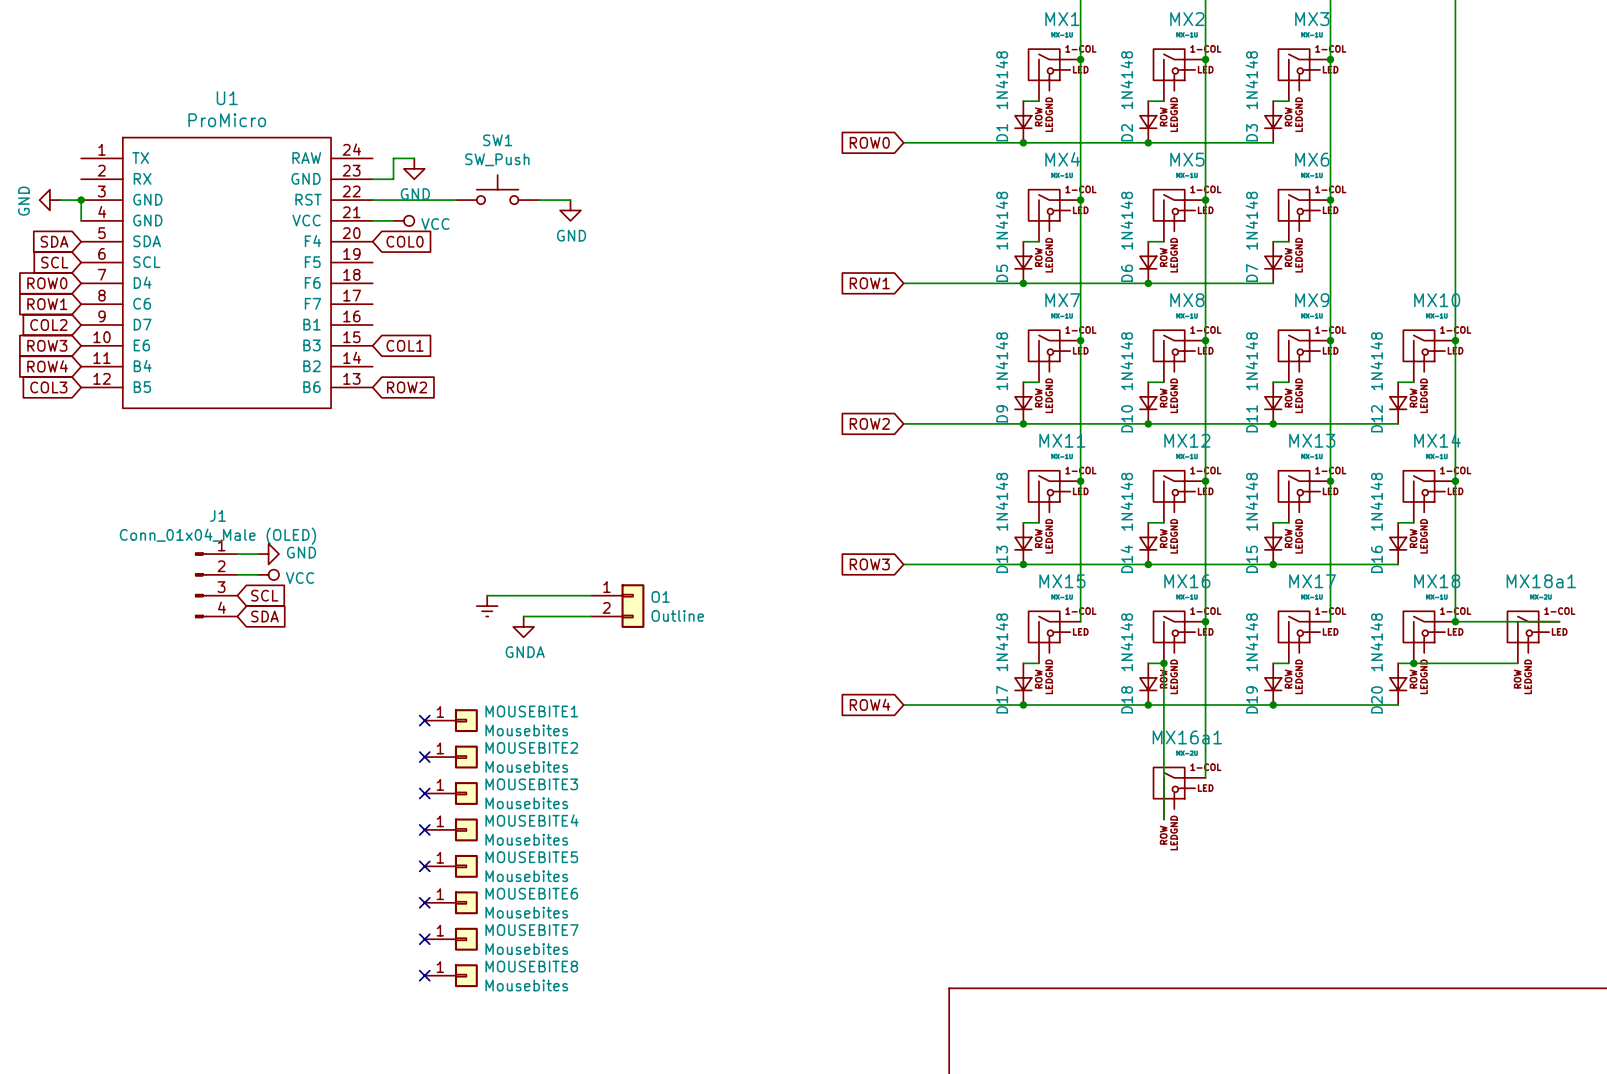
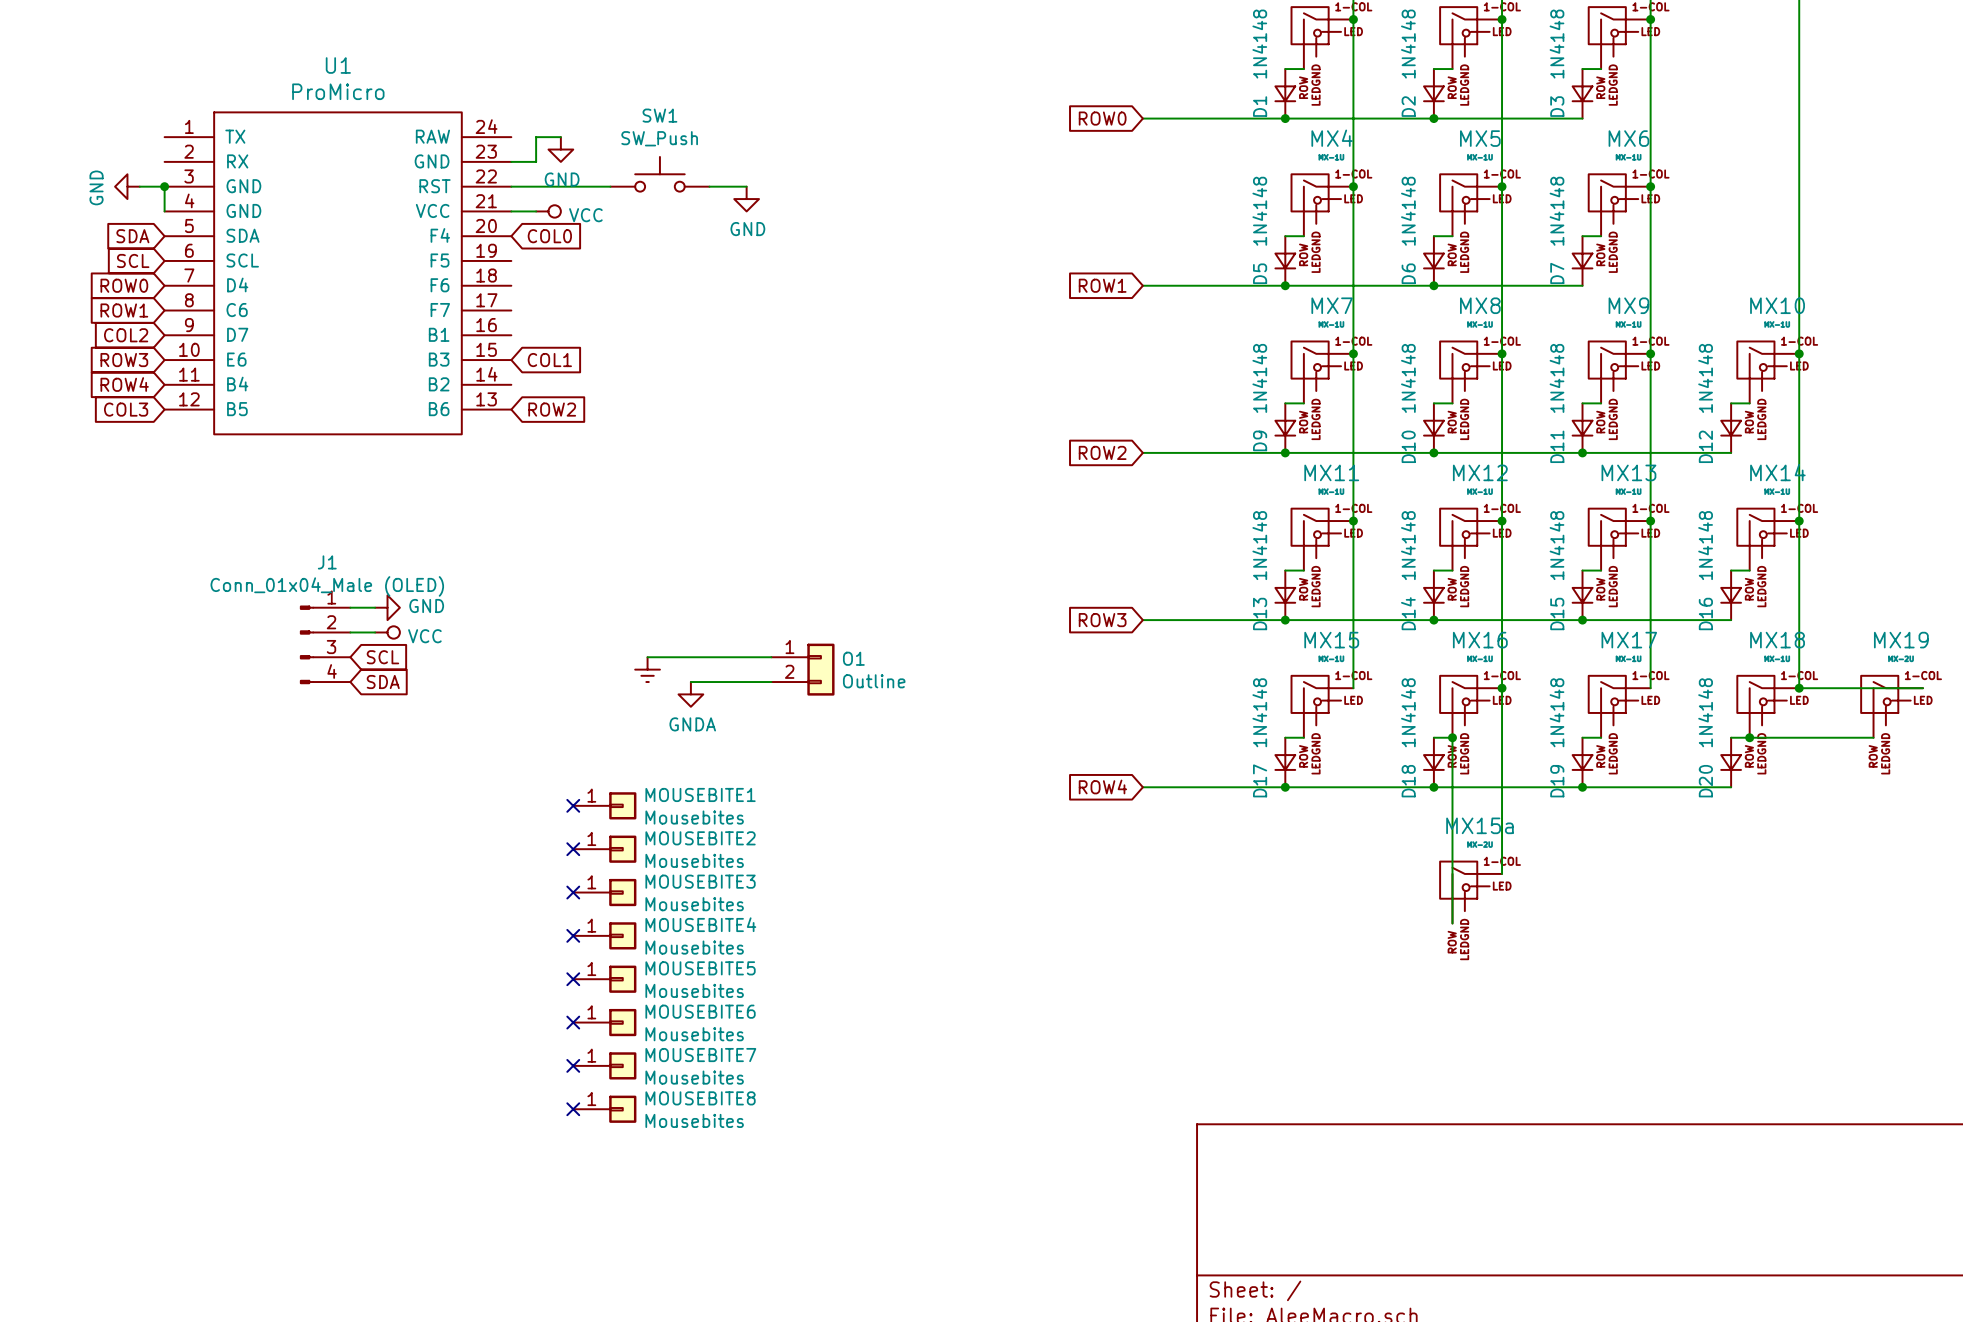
MX18a1 name: MX18a1 (1541, 581) -> MX19 (1901, 640)
MX16a1 name: MX16a1 (1187, 737) -> MX15a (1479, 825)

